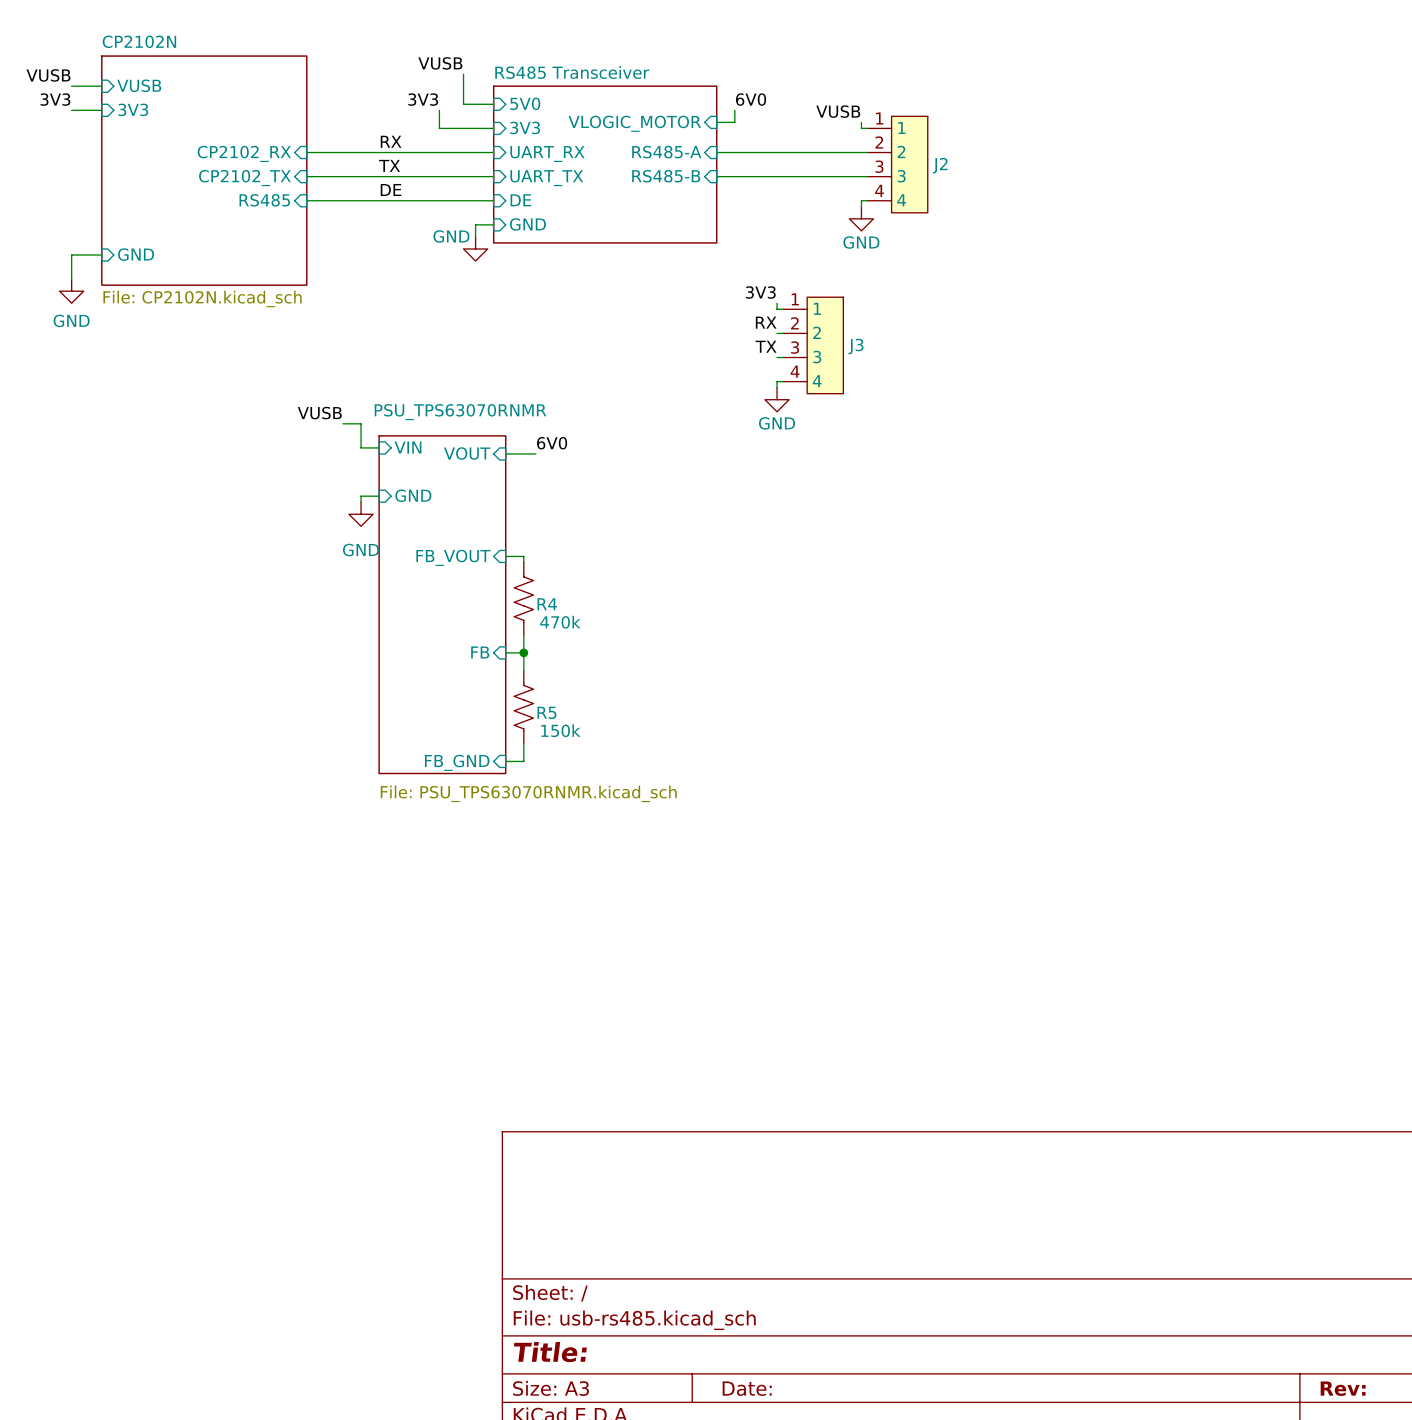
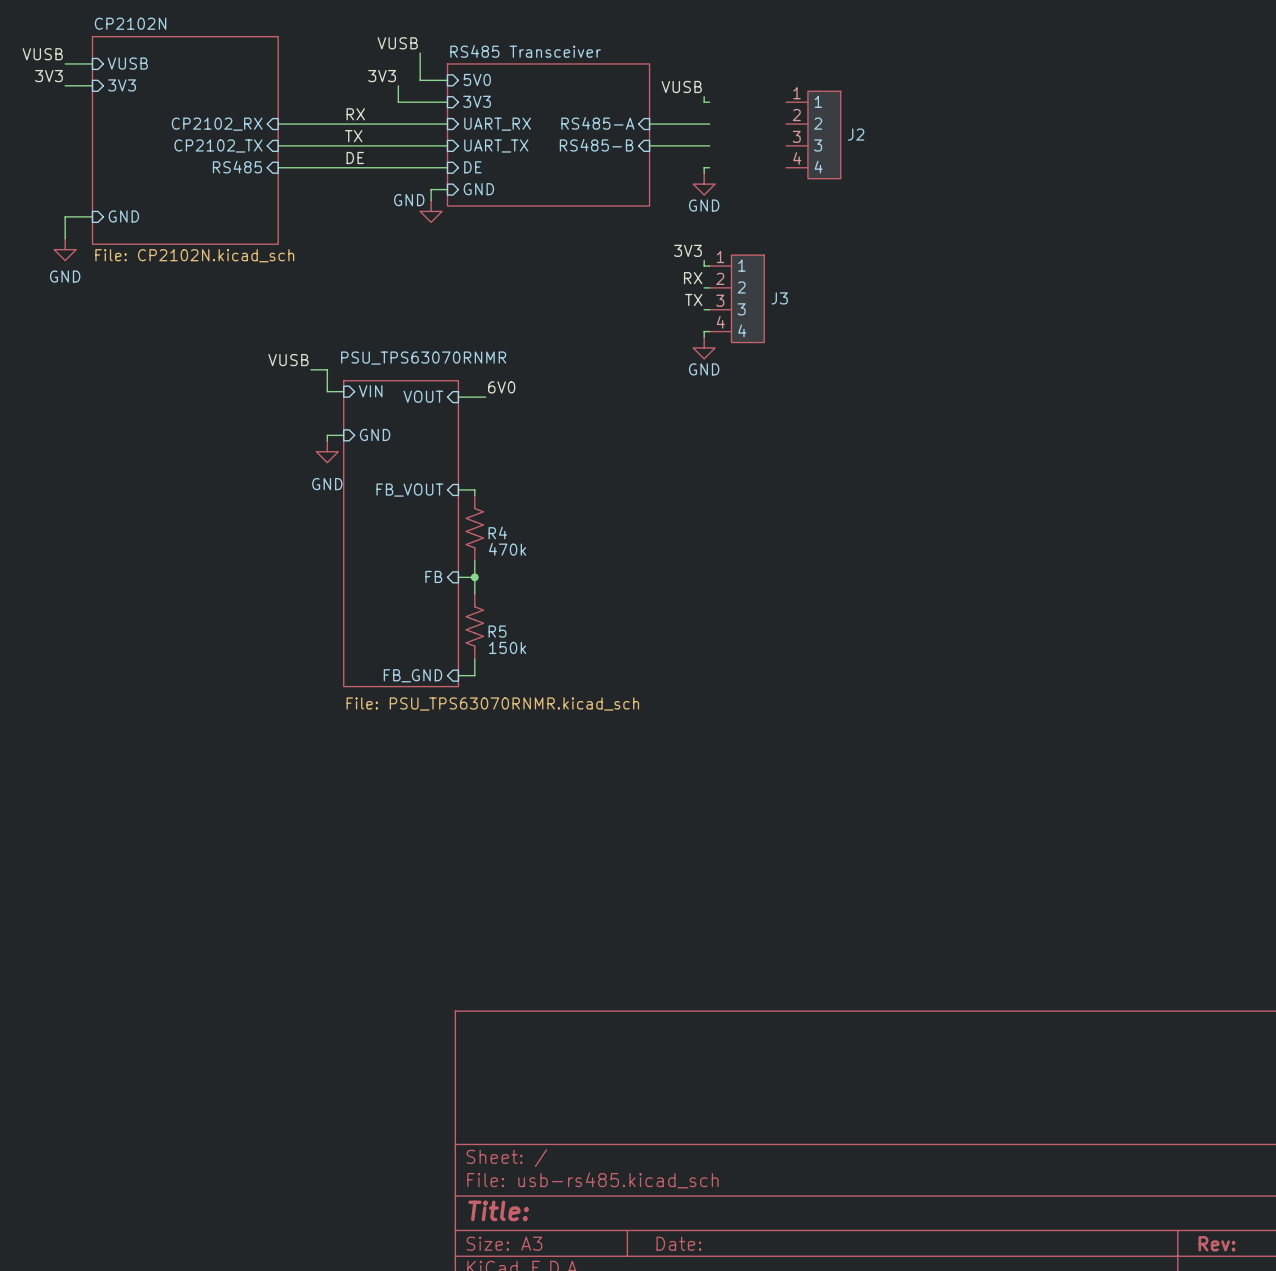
label: 6V0 (751, 99) -> none
wire: (734, 110) (734, 122) (716, 122) -> none
label position: VUSB (838, 111) -> VUSB (681, 86)
wire: (861, 122) (861, 128) (867, 128) -> (704, 96) (704, 102) (709, 102)
sheet pin: VLOGIC_MOTOR (634, 123) -> none
wire: (783, 152) (867, 152) -> none
wire: (783, 176) (867, 176) -> none
wire: (867, 200) (861, 200) (861, 206) -> (709, 167) (704, 167) (704, 173)
power symbol position: GND (861, 218) -> GND (704, 184)

